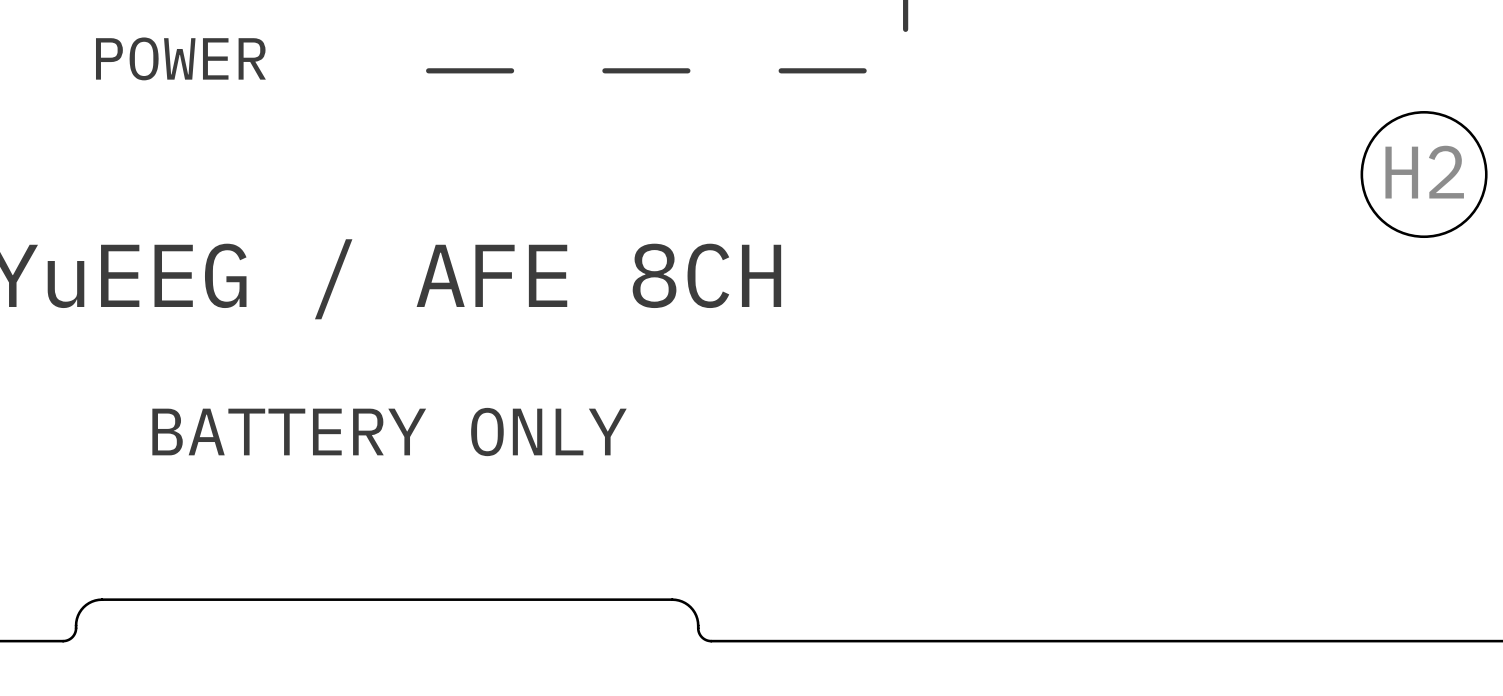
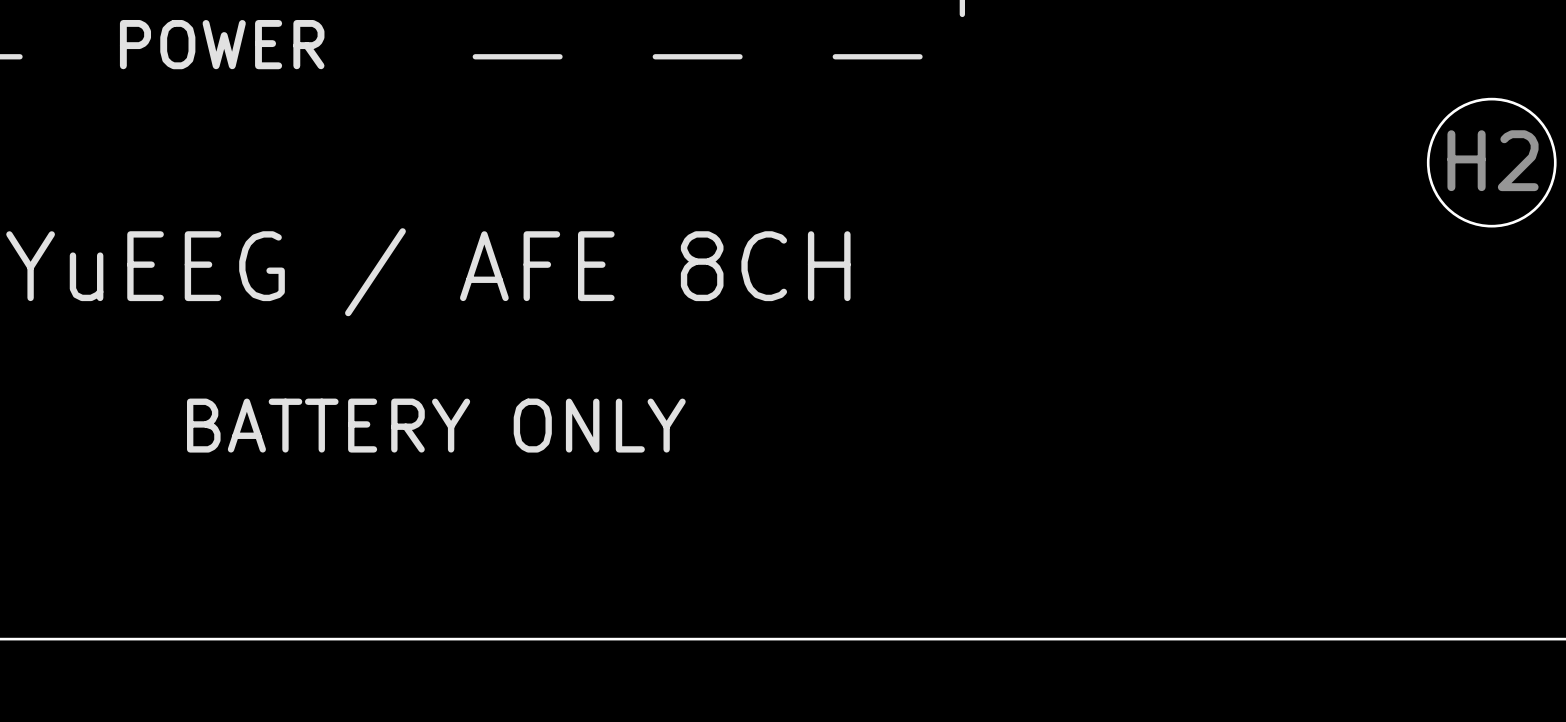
board edge: (63, 641) (70, 639) (74, 635) (78, 615) (83, 607) (92, 601) (102, 599) (675, 599) (685, 603) (692, 609) (697, 618) (700, 635) (705, 639) (711, 641) -> (102, 639) (763, 639)

